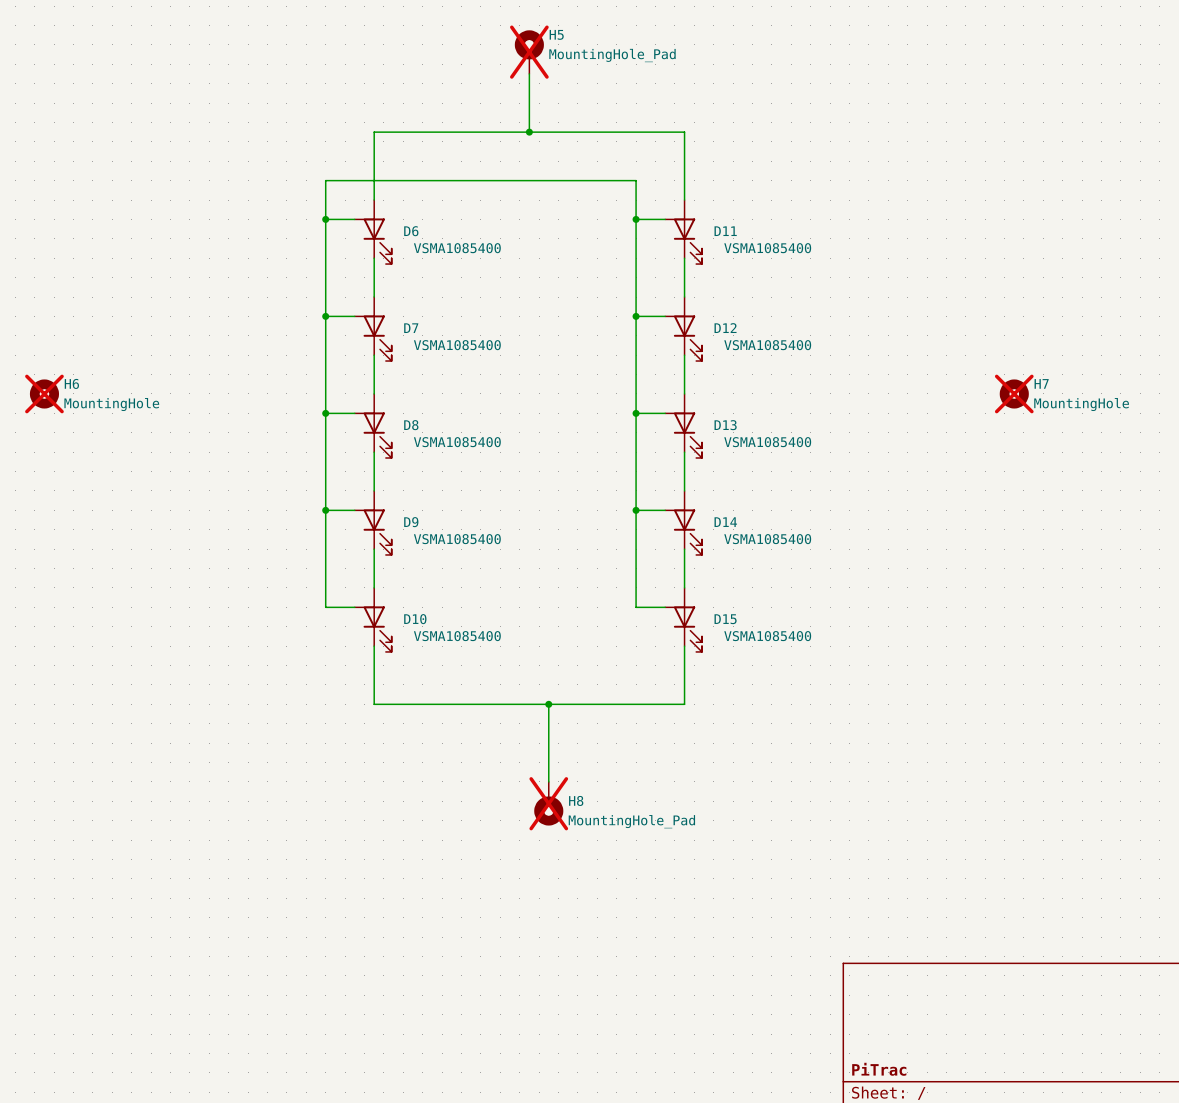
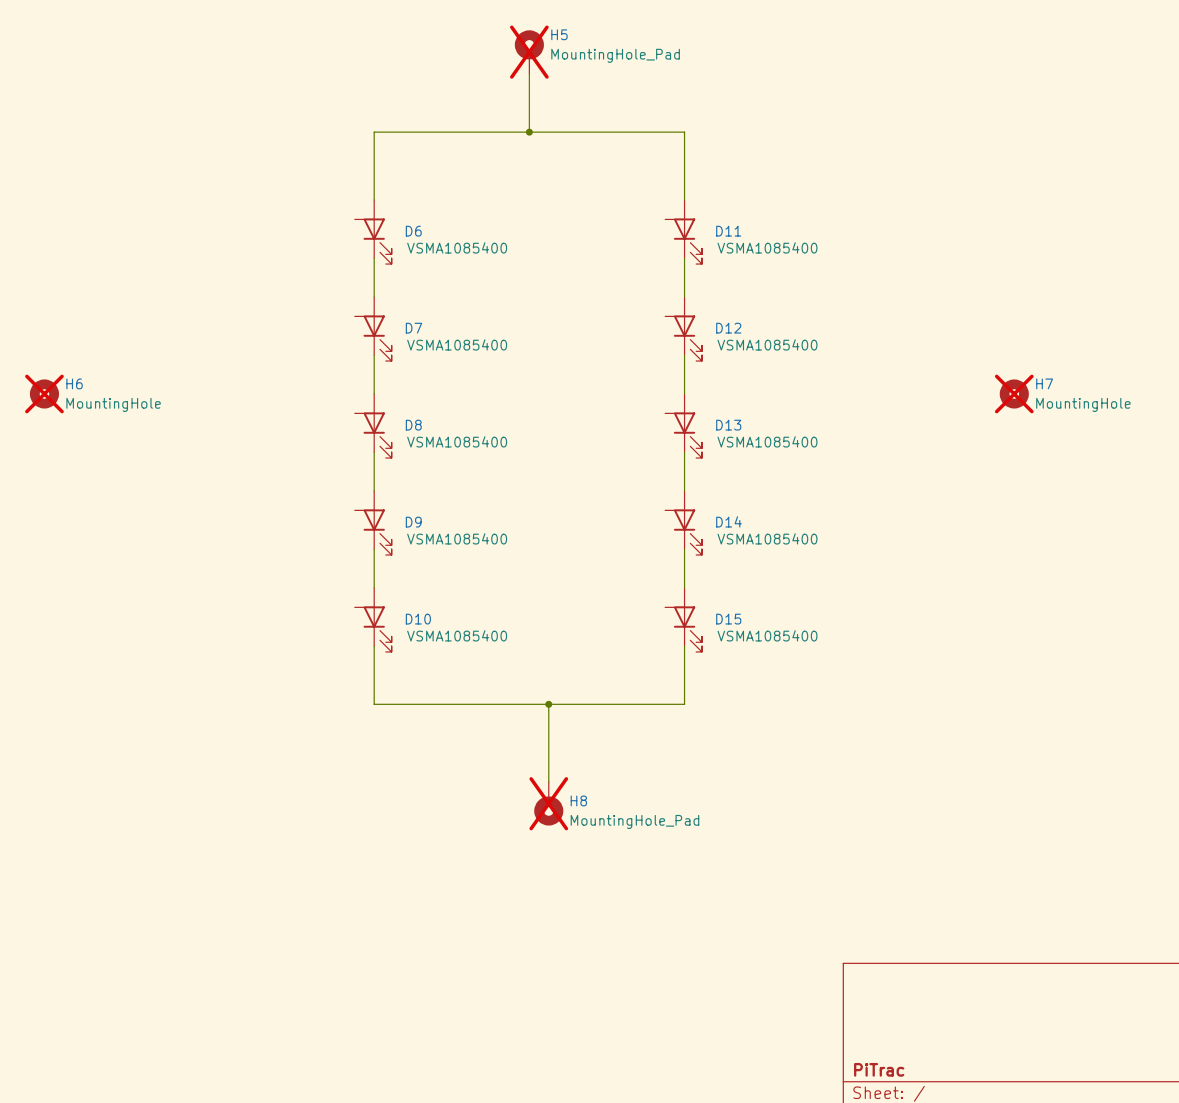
wire: (325, 219) (354, 219) -> none
junction: (325, 219) -> none
wire: (636, 219) (665, 219) -> none
junction: (636, 219) -> none
wire: (325, 316) (354, 316) -> none
junction: (325, 316) -> none
wire: (636, 316) (665, 316) -> none
junction: (636, 316) -> none
wire: (325, 413) (354, 413) -> none
junction: (325, 413) -> none
wire: (636, 413) (665, 413) -> none
junction: (636, 413) -> none
wire: (325, 510) (354, 510) -> none
junction: (325, 510) -> none
wire: (636, 510) (665, 510) -> none
junction: (636, 510) -> none
wire: (354, 607) (325, 607) (325, 180) (636, 180) (636, 607) (665, 607) -> none

